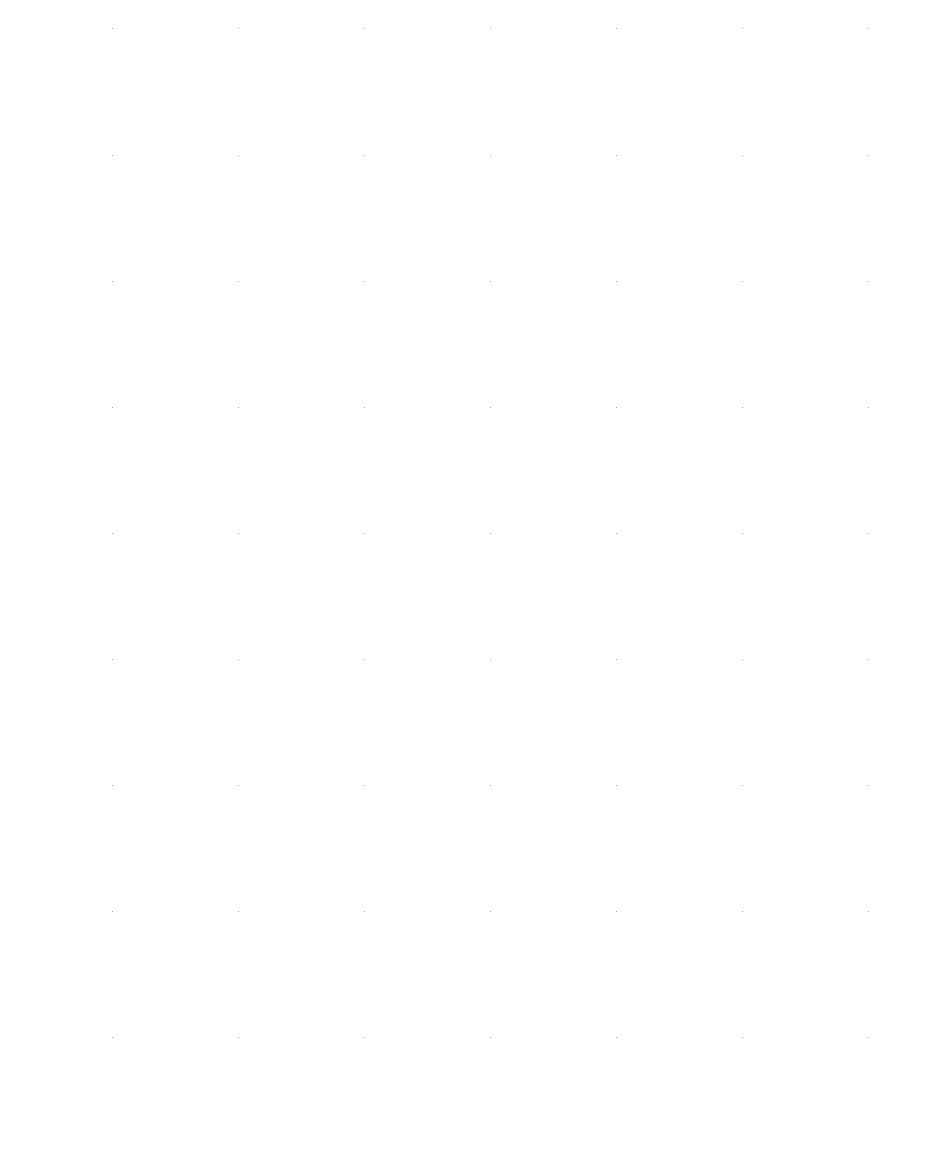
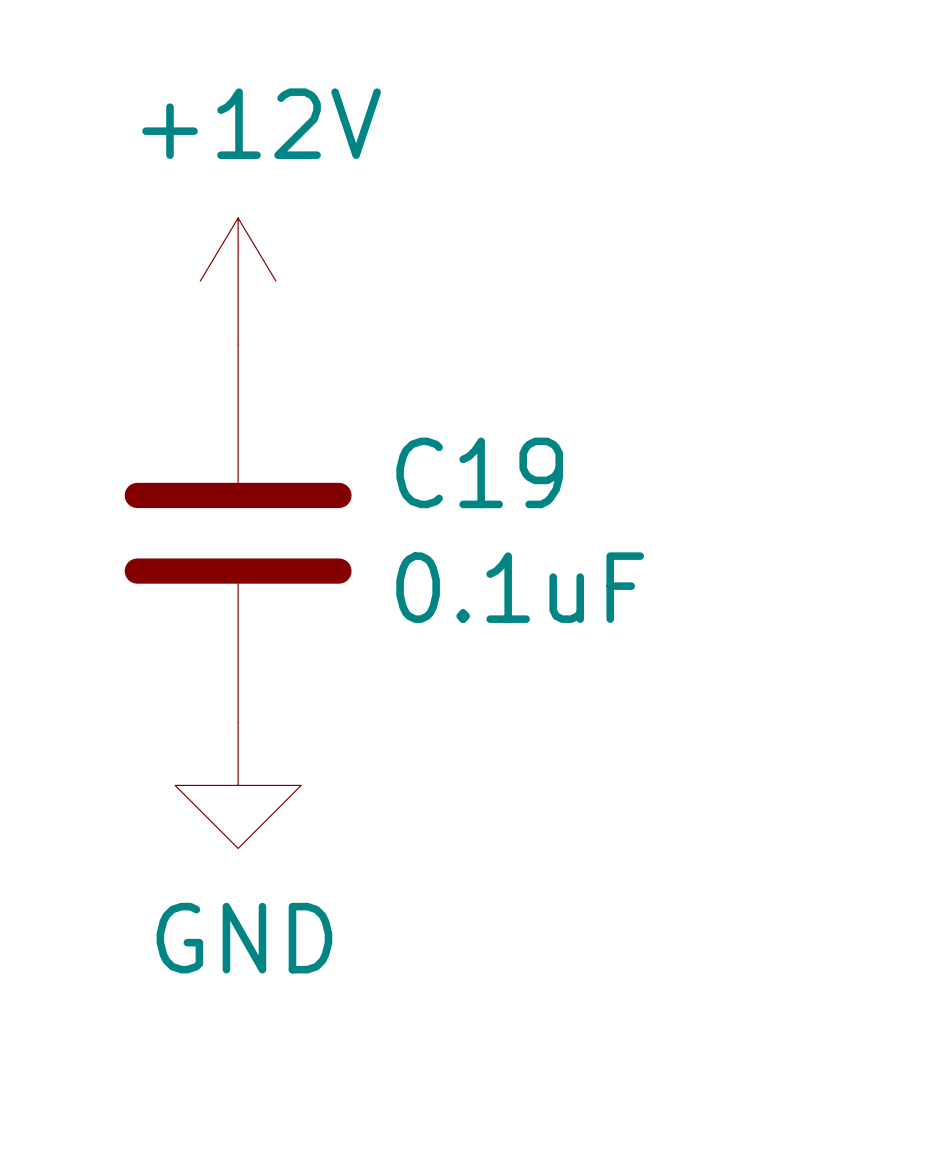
power symbol: none -> +12V (238, 281)
C19: none -> 0.1uF (238, 533)
power symbol: none -> GND (238, 785)

